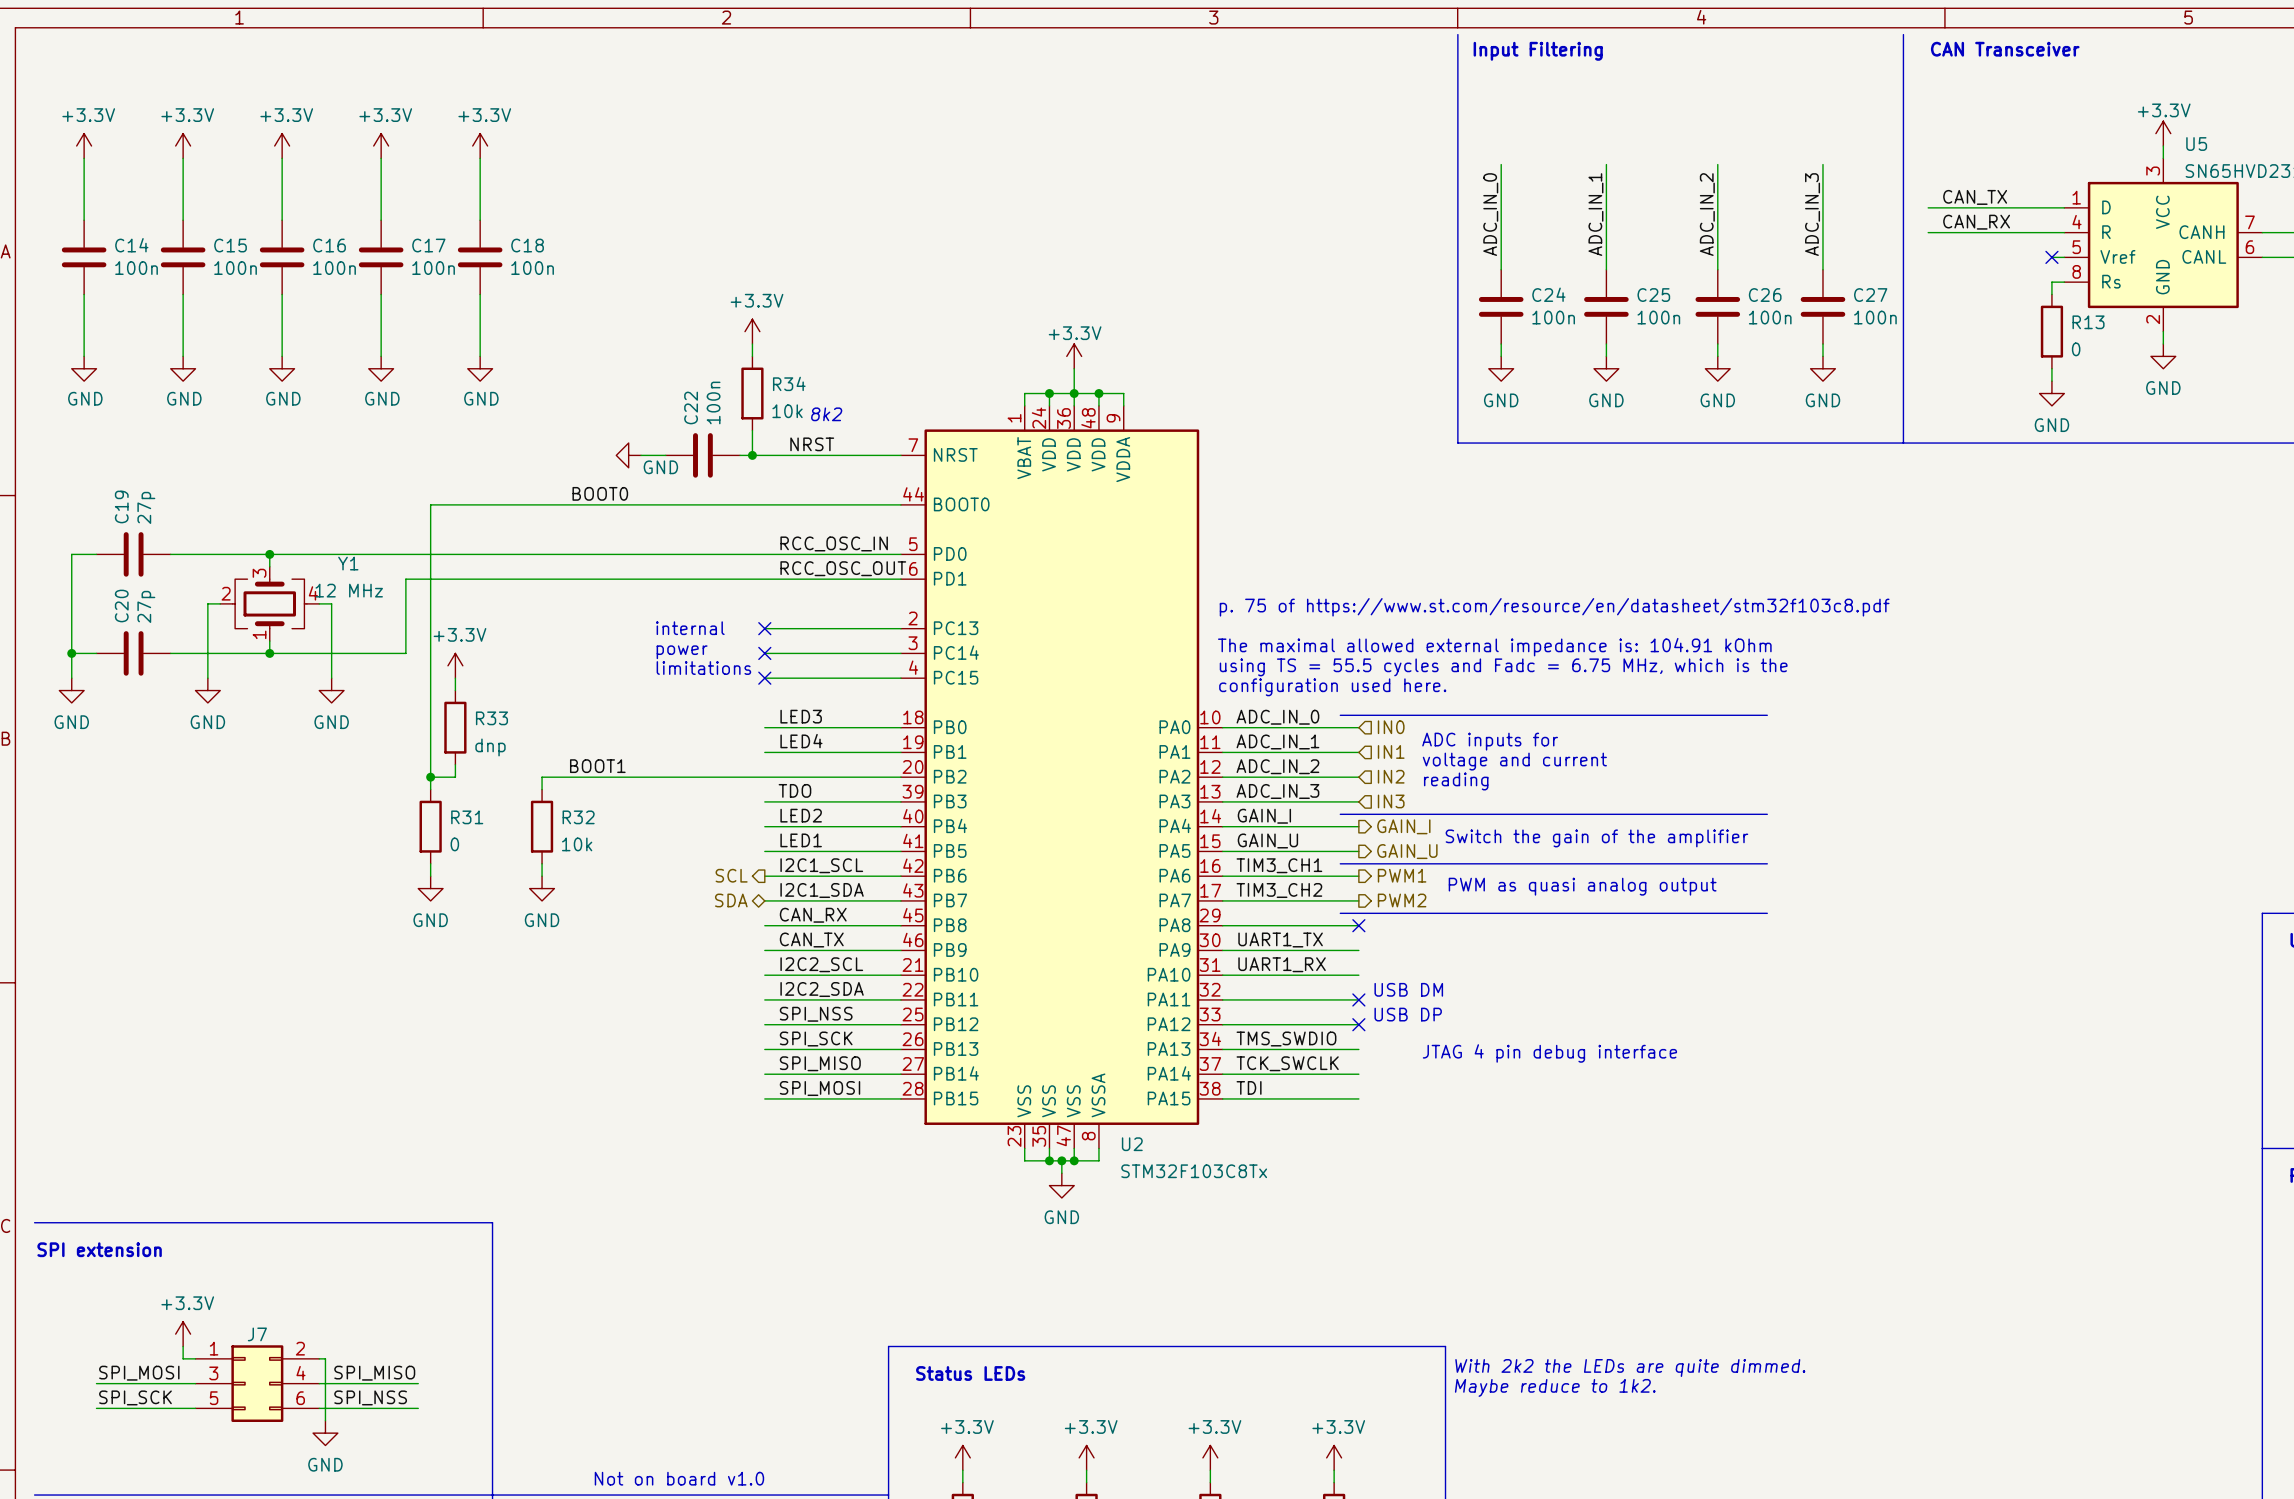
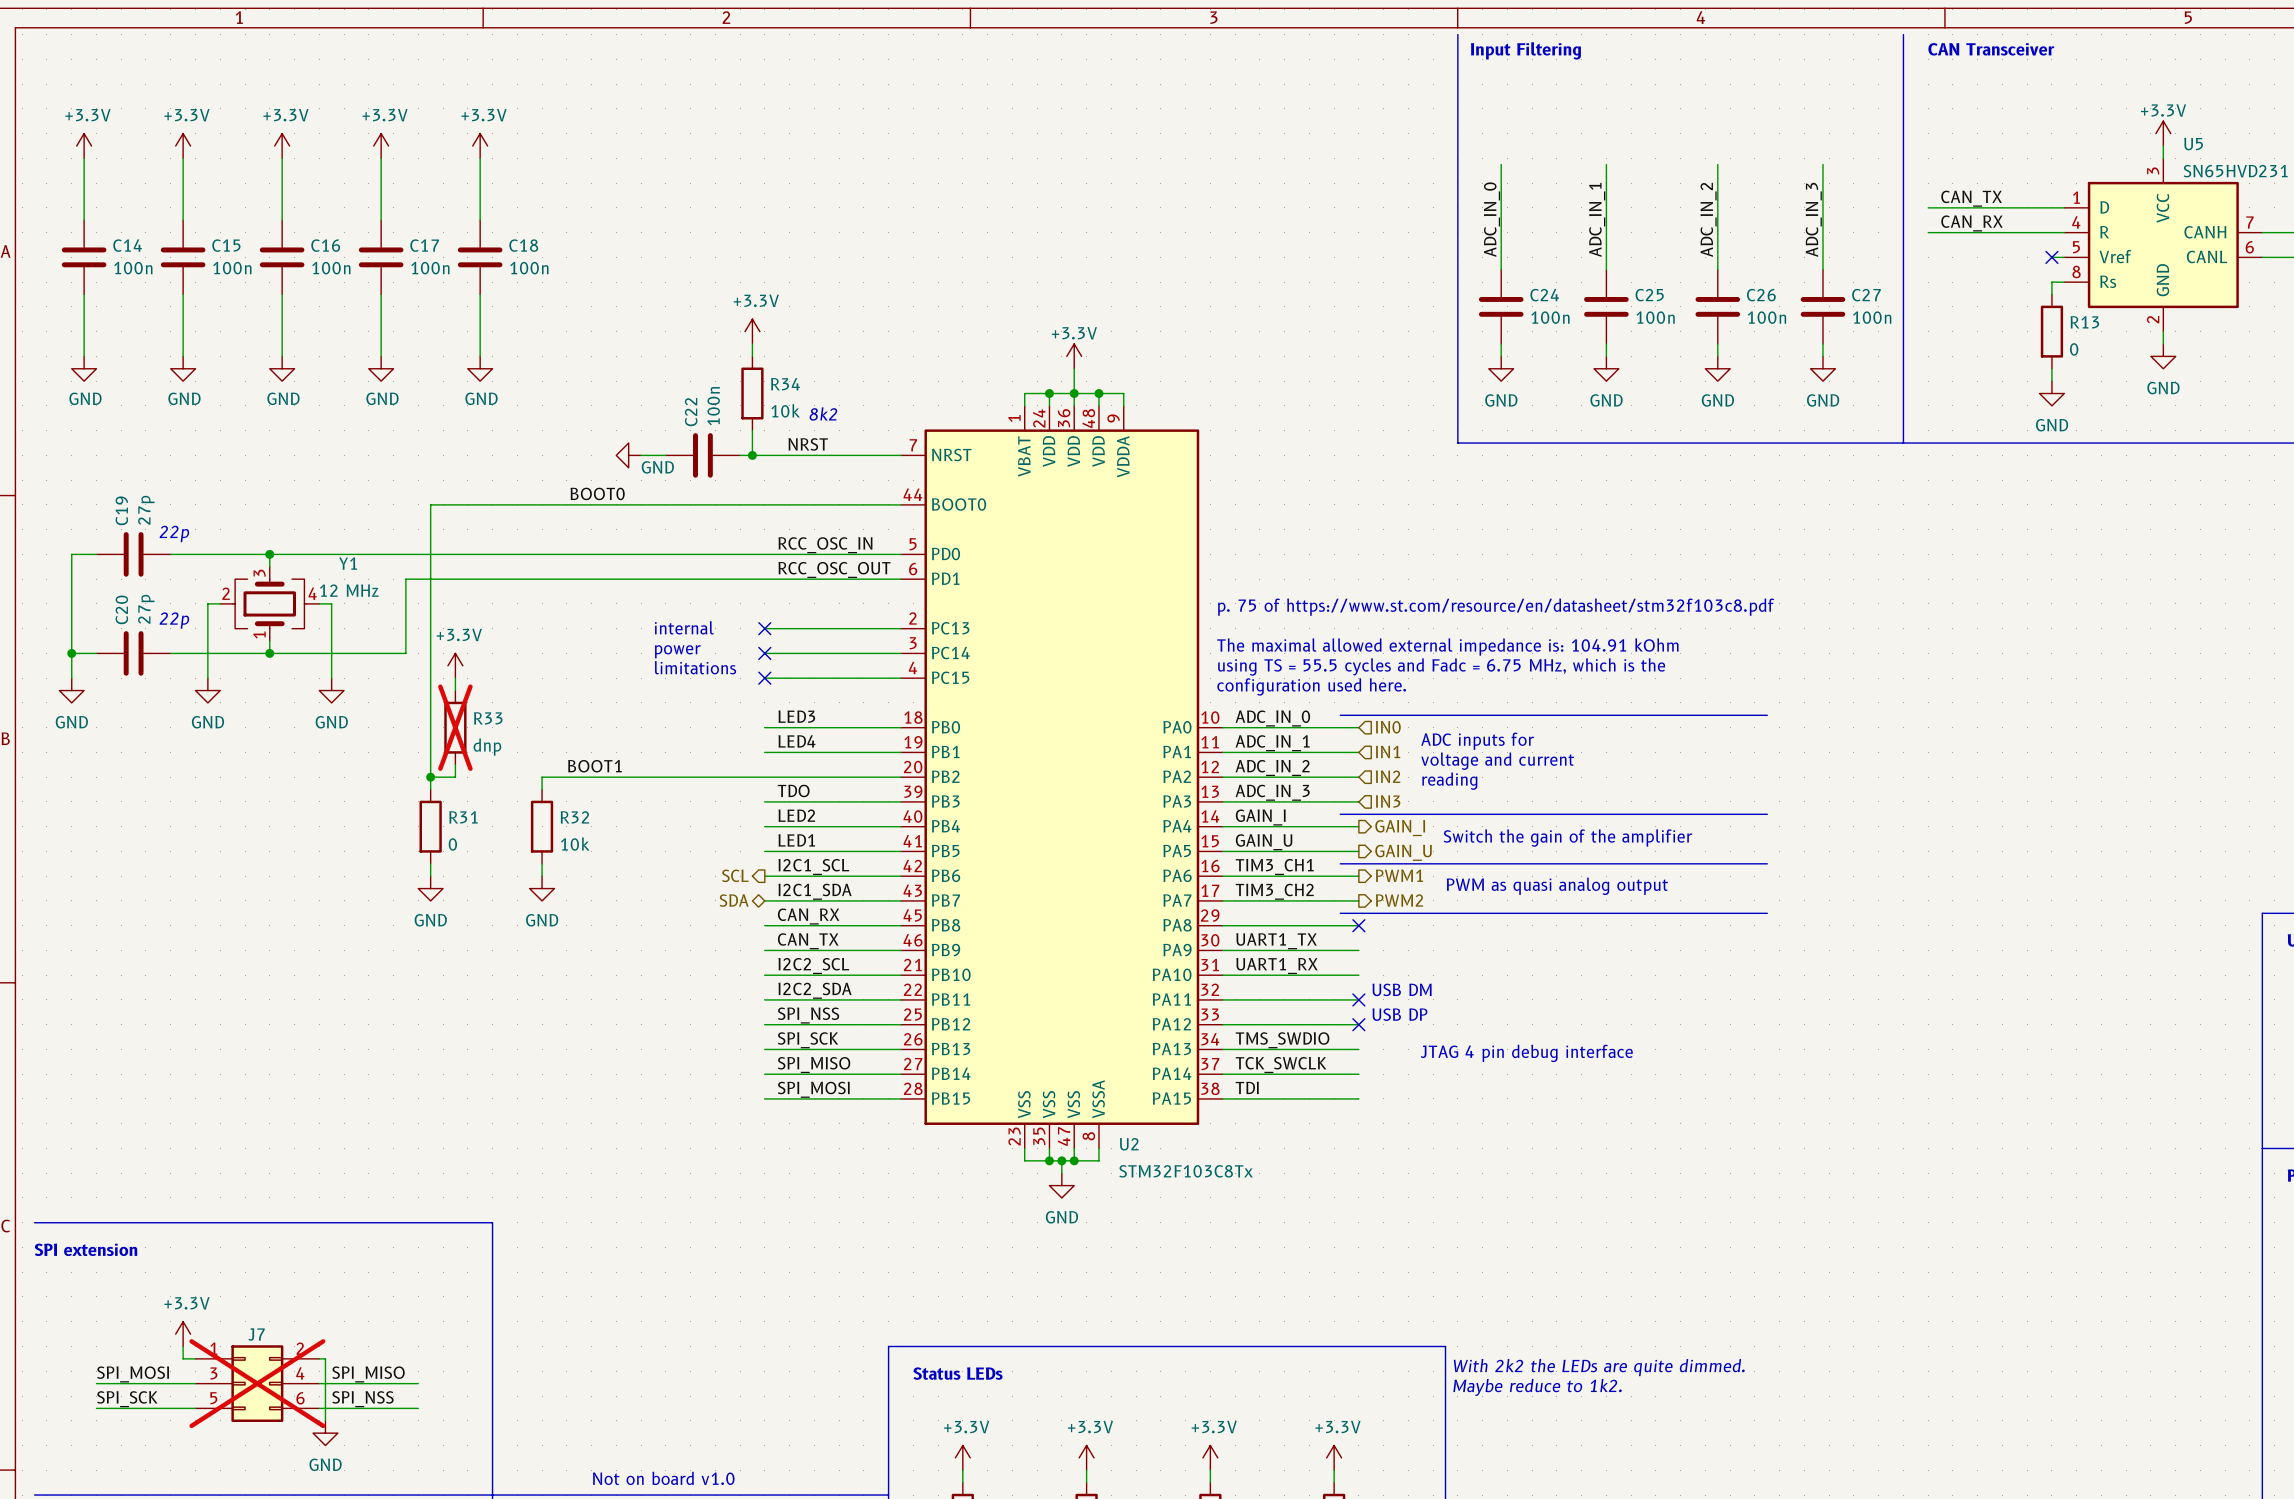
text: none -> 22p (174, 533)
text: none -> 22p (174, 620)
R33 do-not-place cross: none -> (455, 727)
J7 do-not-place cross: none -> (257, 1383)

